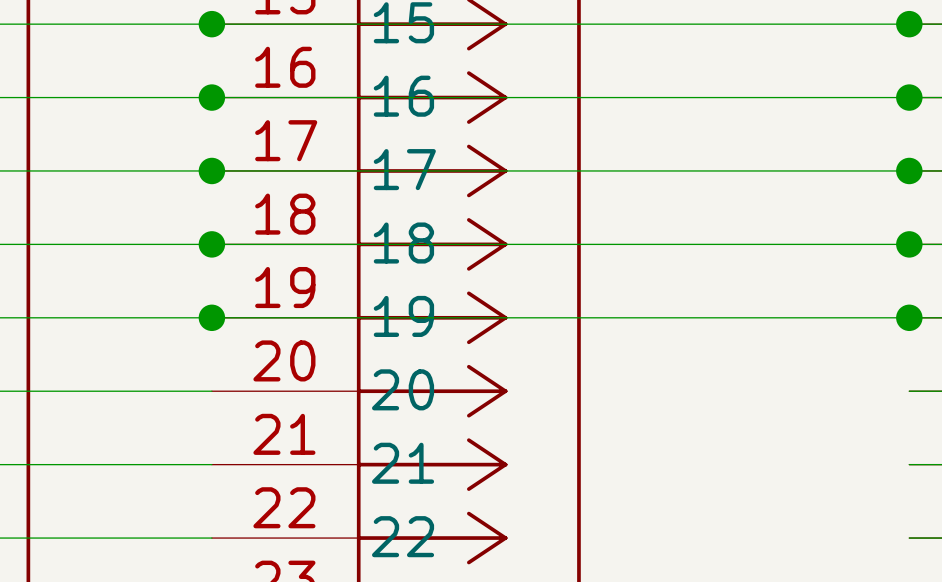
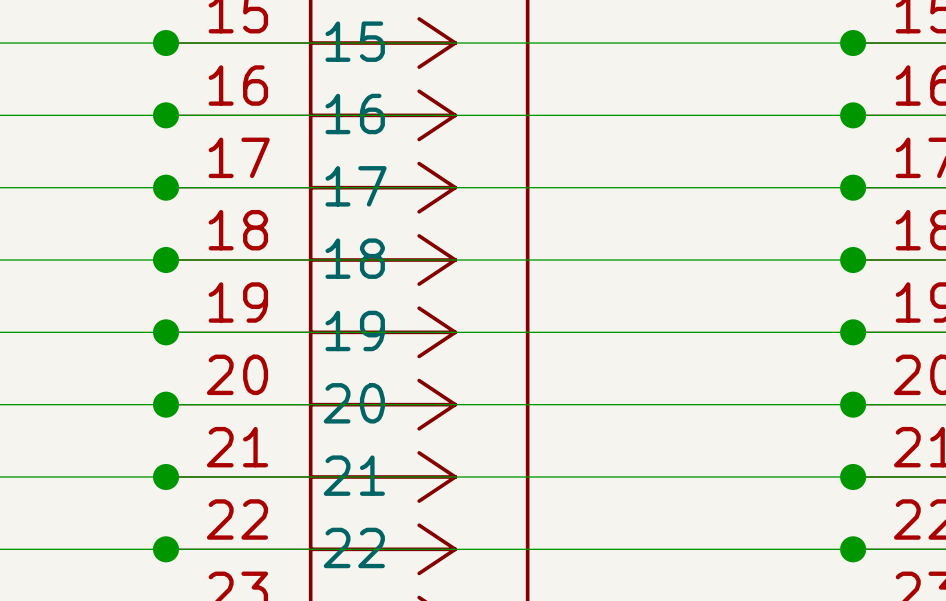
wire: none -> (166, 404) (853, 404)
junction: none -> (166, 404)
junction: none -> (853, 404)
wire: none -> (166, 476) (853, 476)
junction: none -> (166, 476)
junction: none -> (853, 476)
wire: none -> (166, 549) (853, 549)
junction: none -> (166, 549)
junction: none -> (853, 549)

